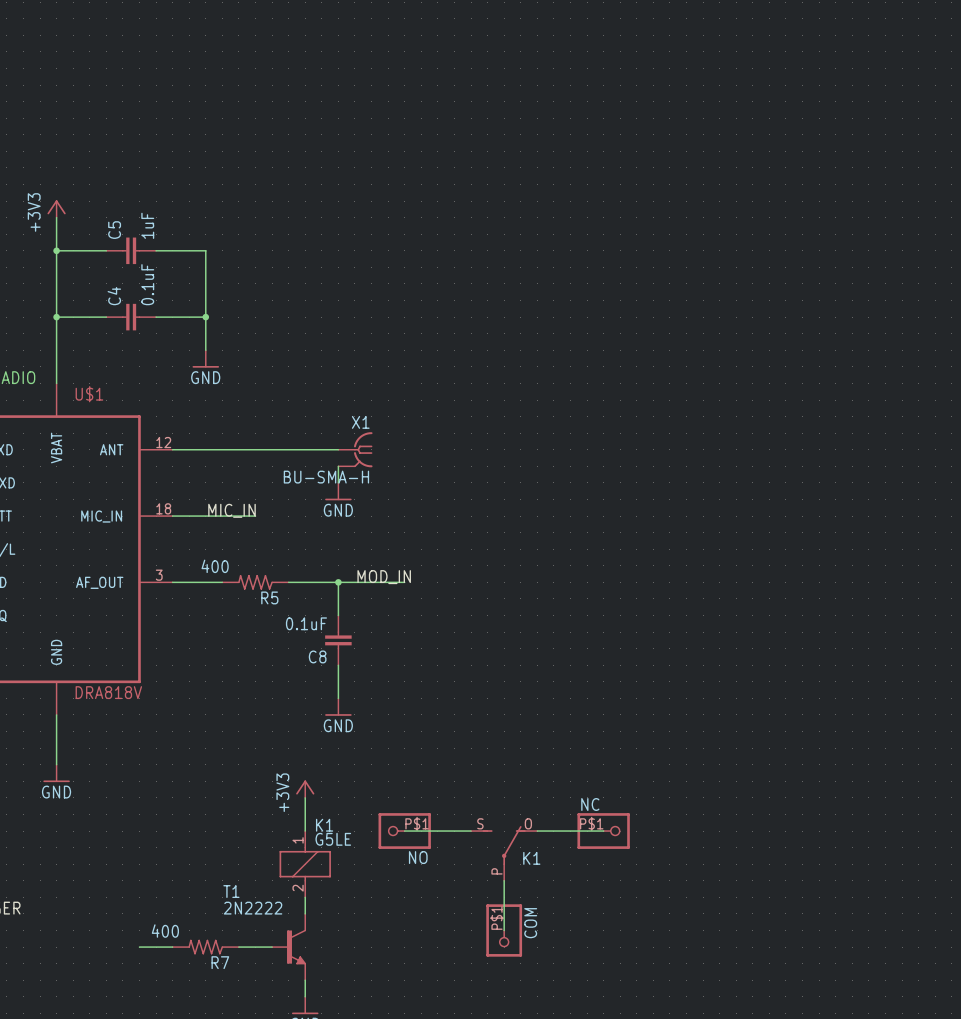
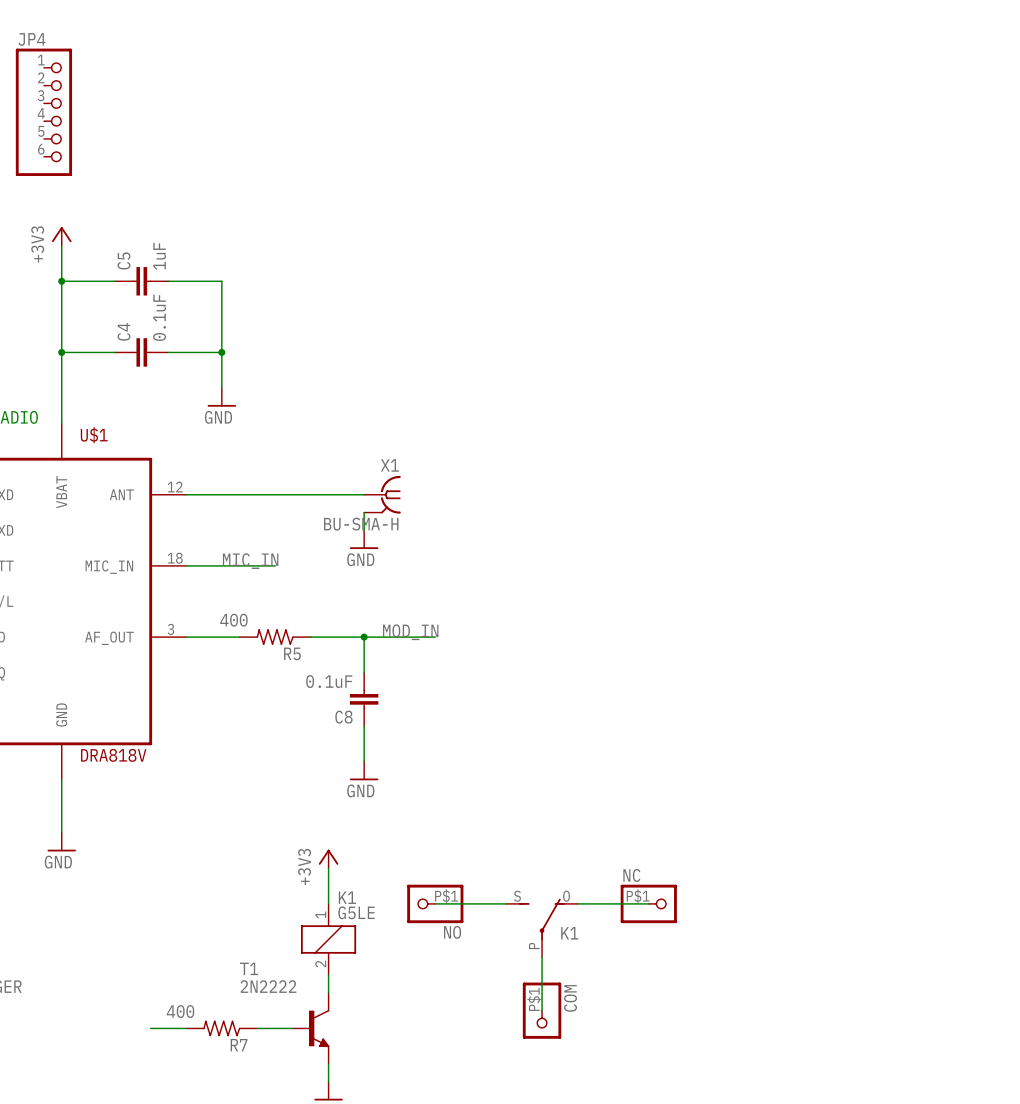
JP4: none -> (43, 112)

